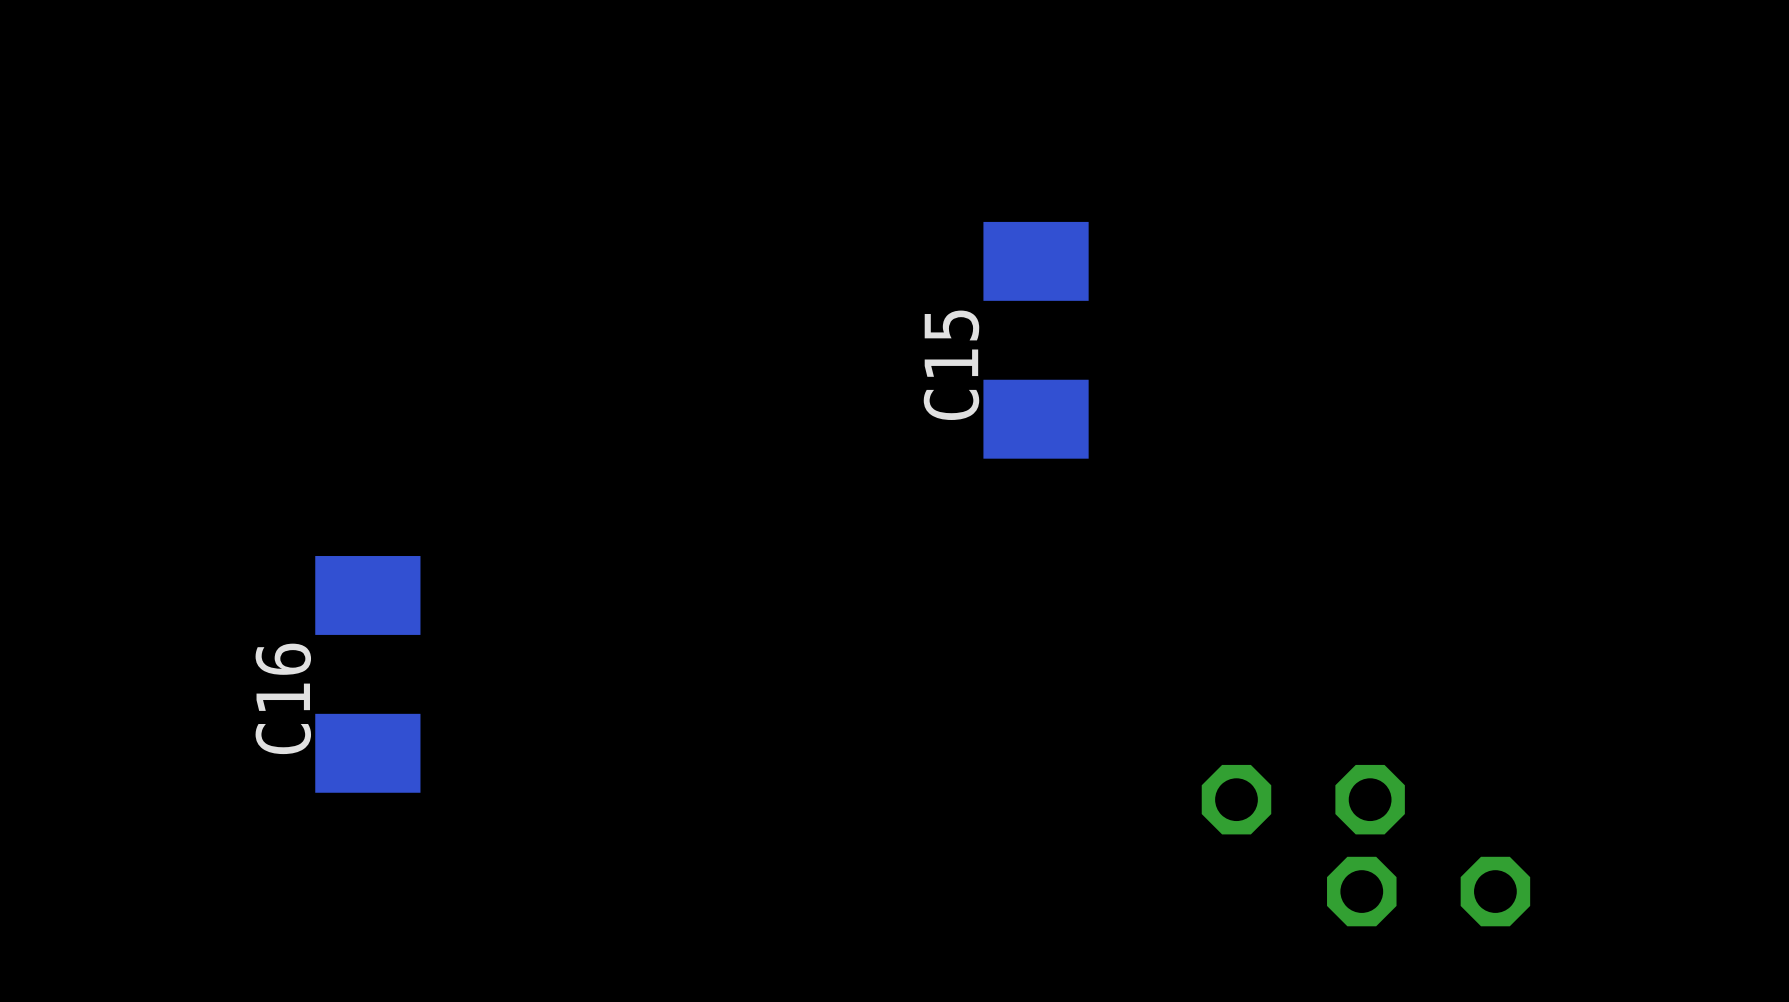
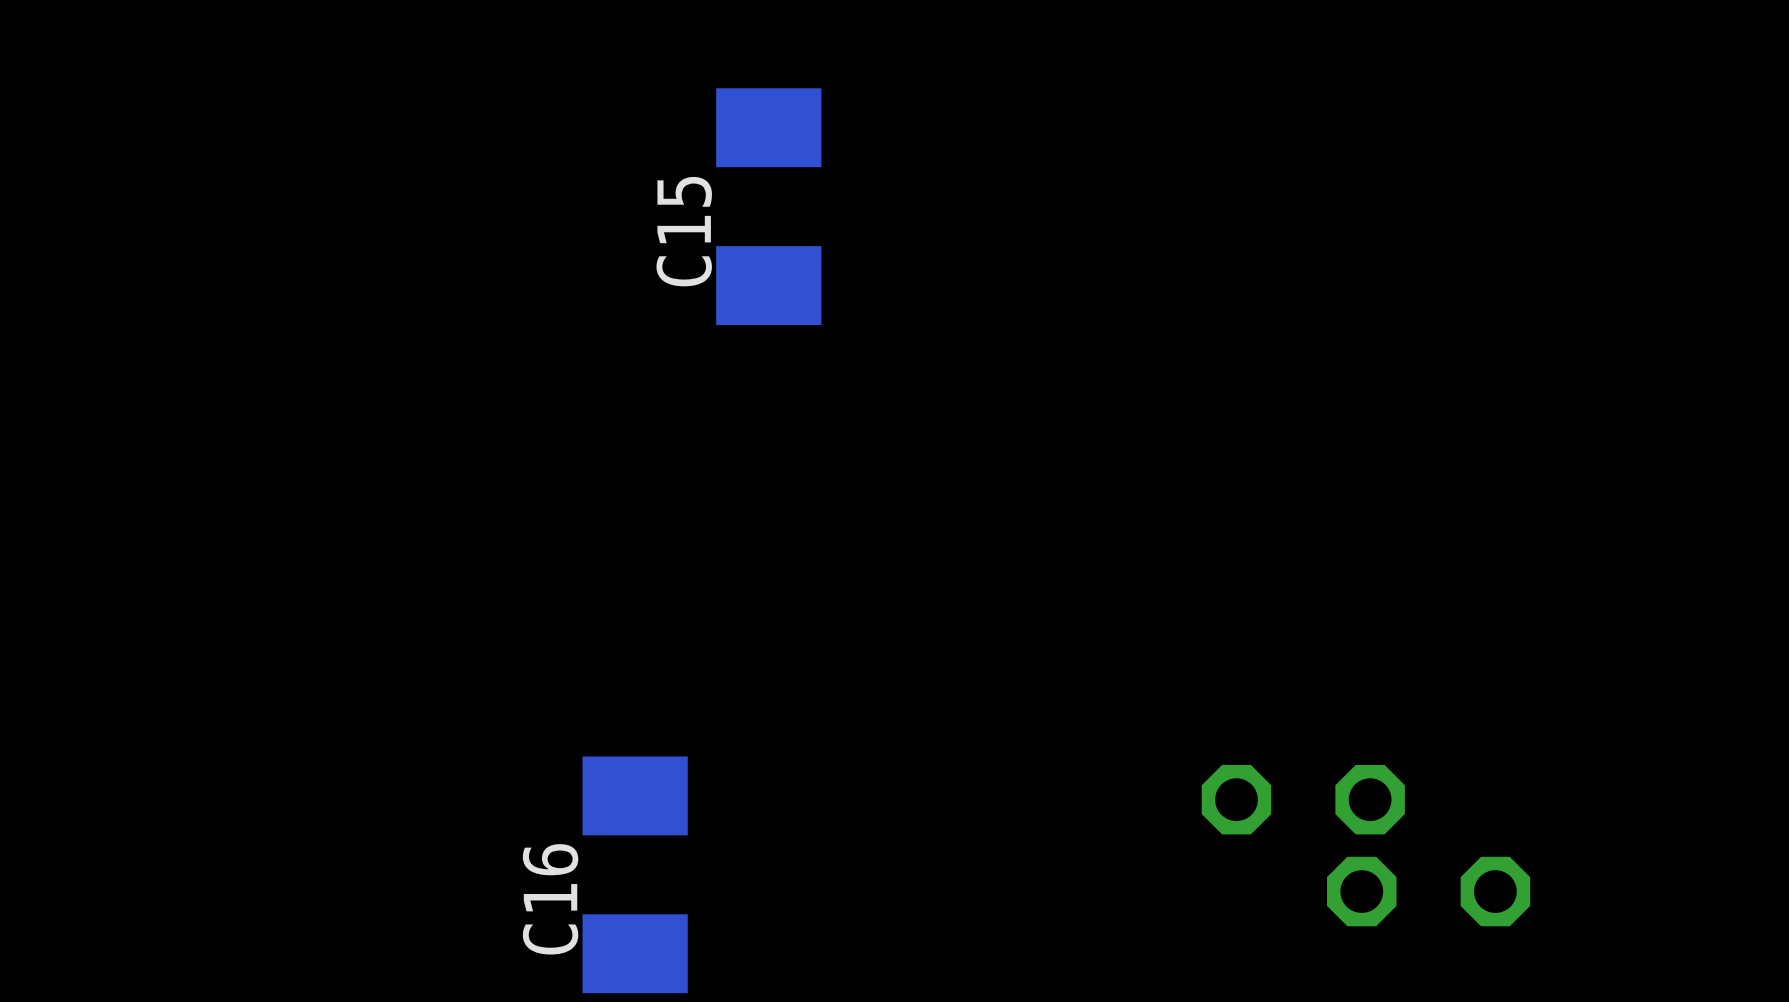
C15 position: (1036, 340) -> (768, 206)
C16 position: (367, 674) -> (635, 874)

